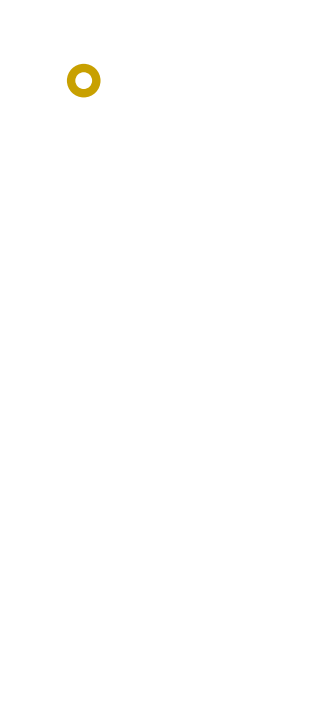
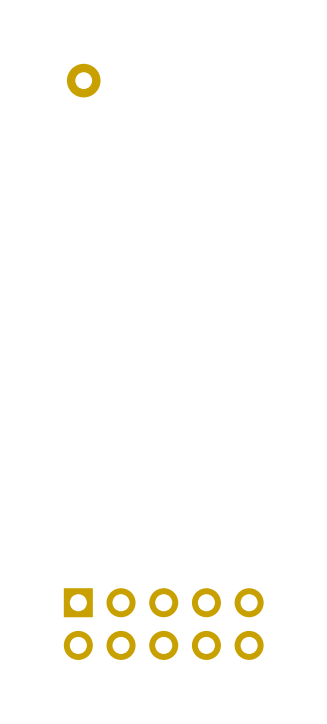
part: none -> (163, 624)

